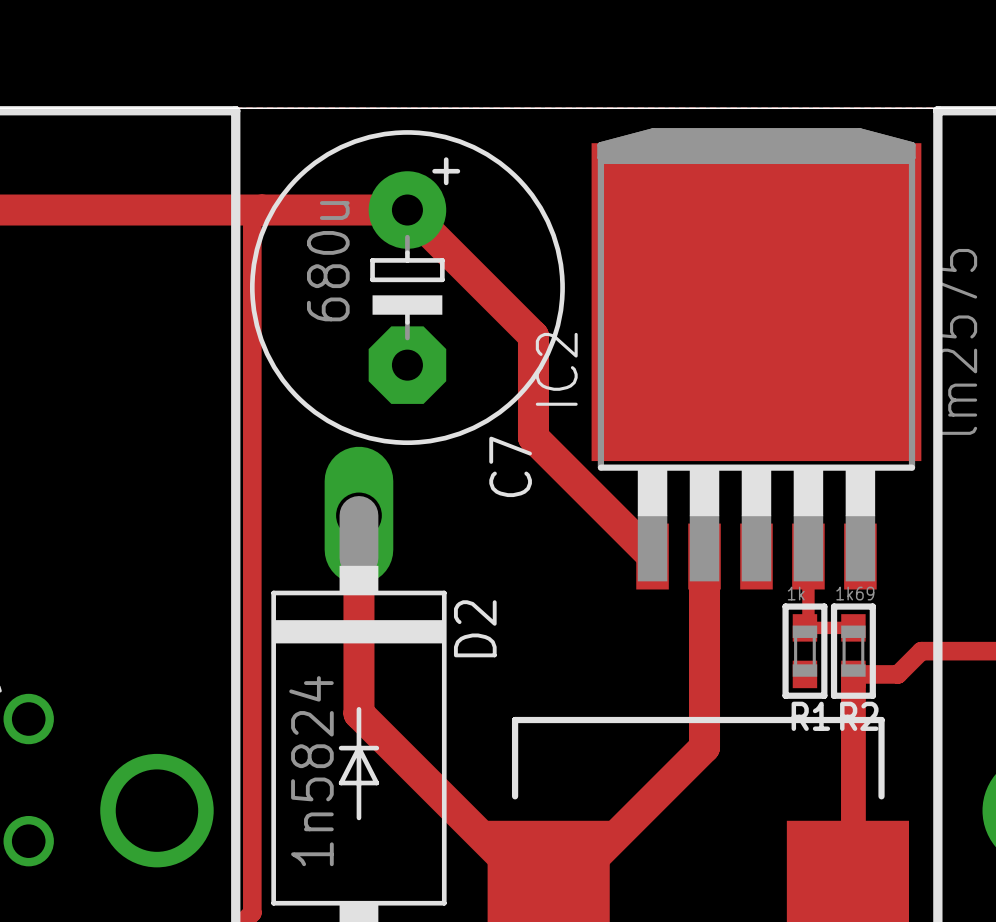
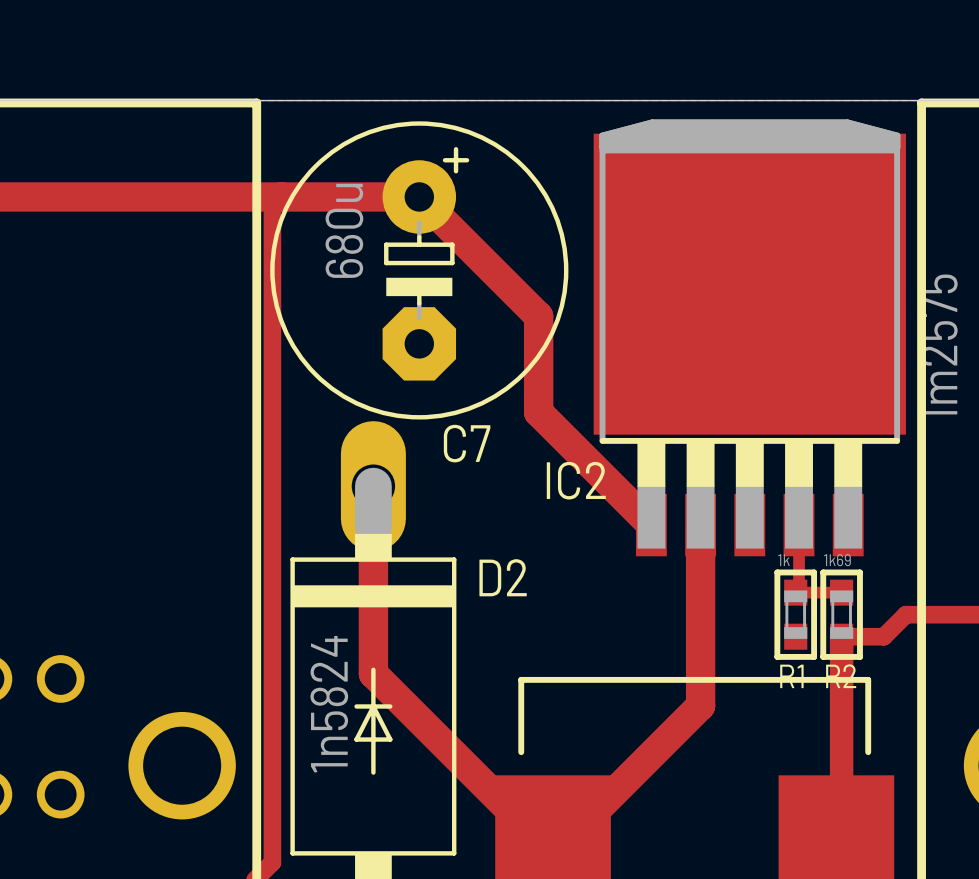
IC2 name rotation: 0° (556, 369) -> 90° clockwise (576, 480)
IC2 name position: IC2 (556, 369) -> IC2 (576, 480)
C7 name rotation: 0° (510, 466) -> 90° clockwise (467, 443)
D2 name rotation: 0° (475, 628) -> 90° clockwise (503, 577)

